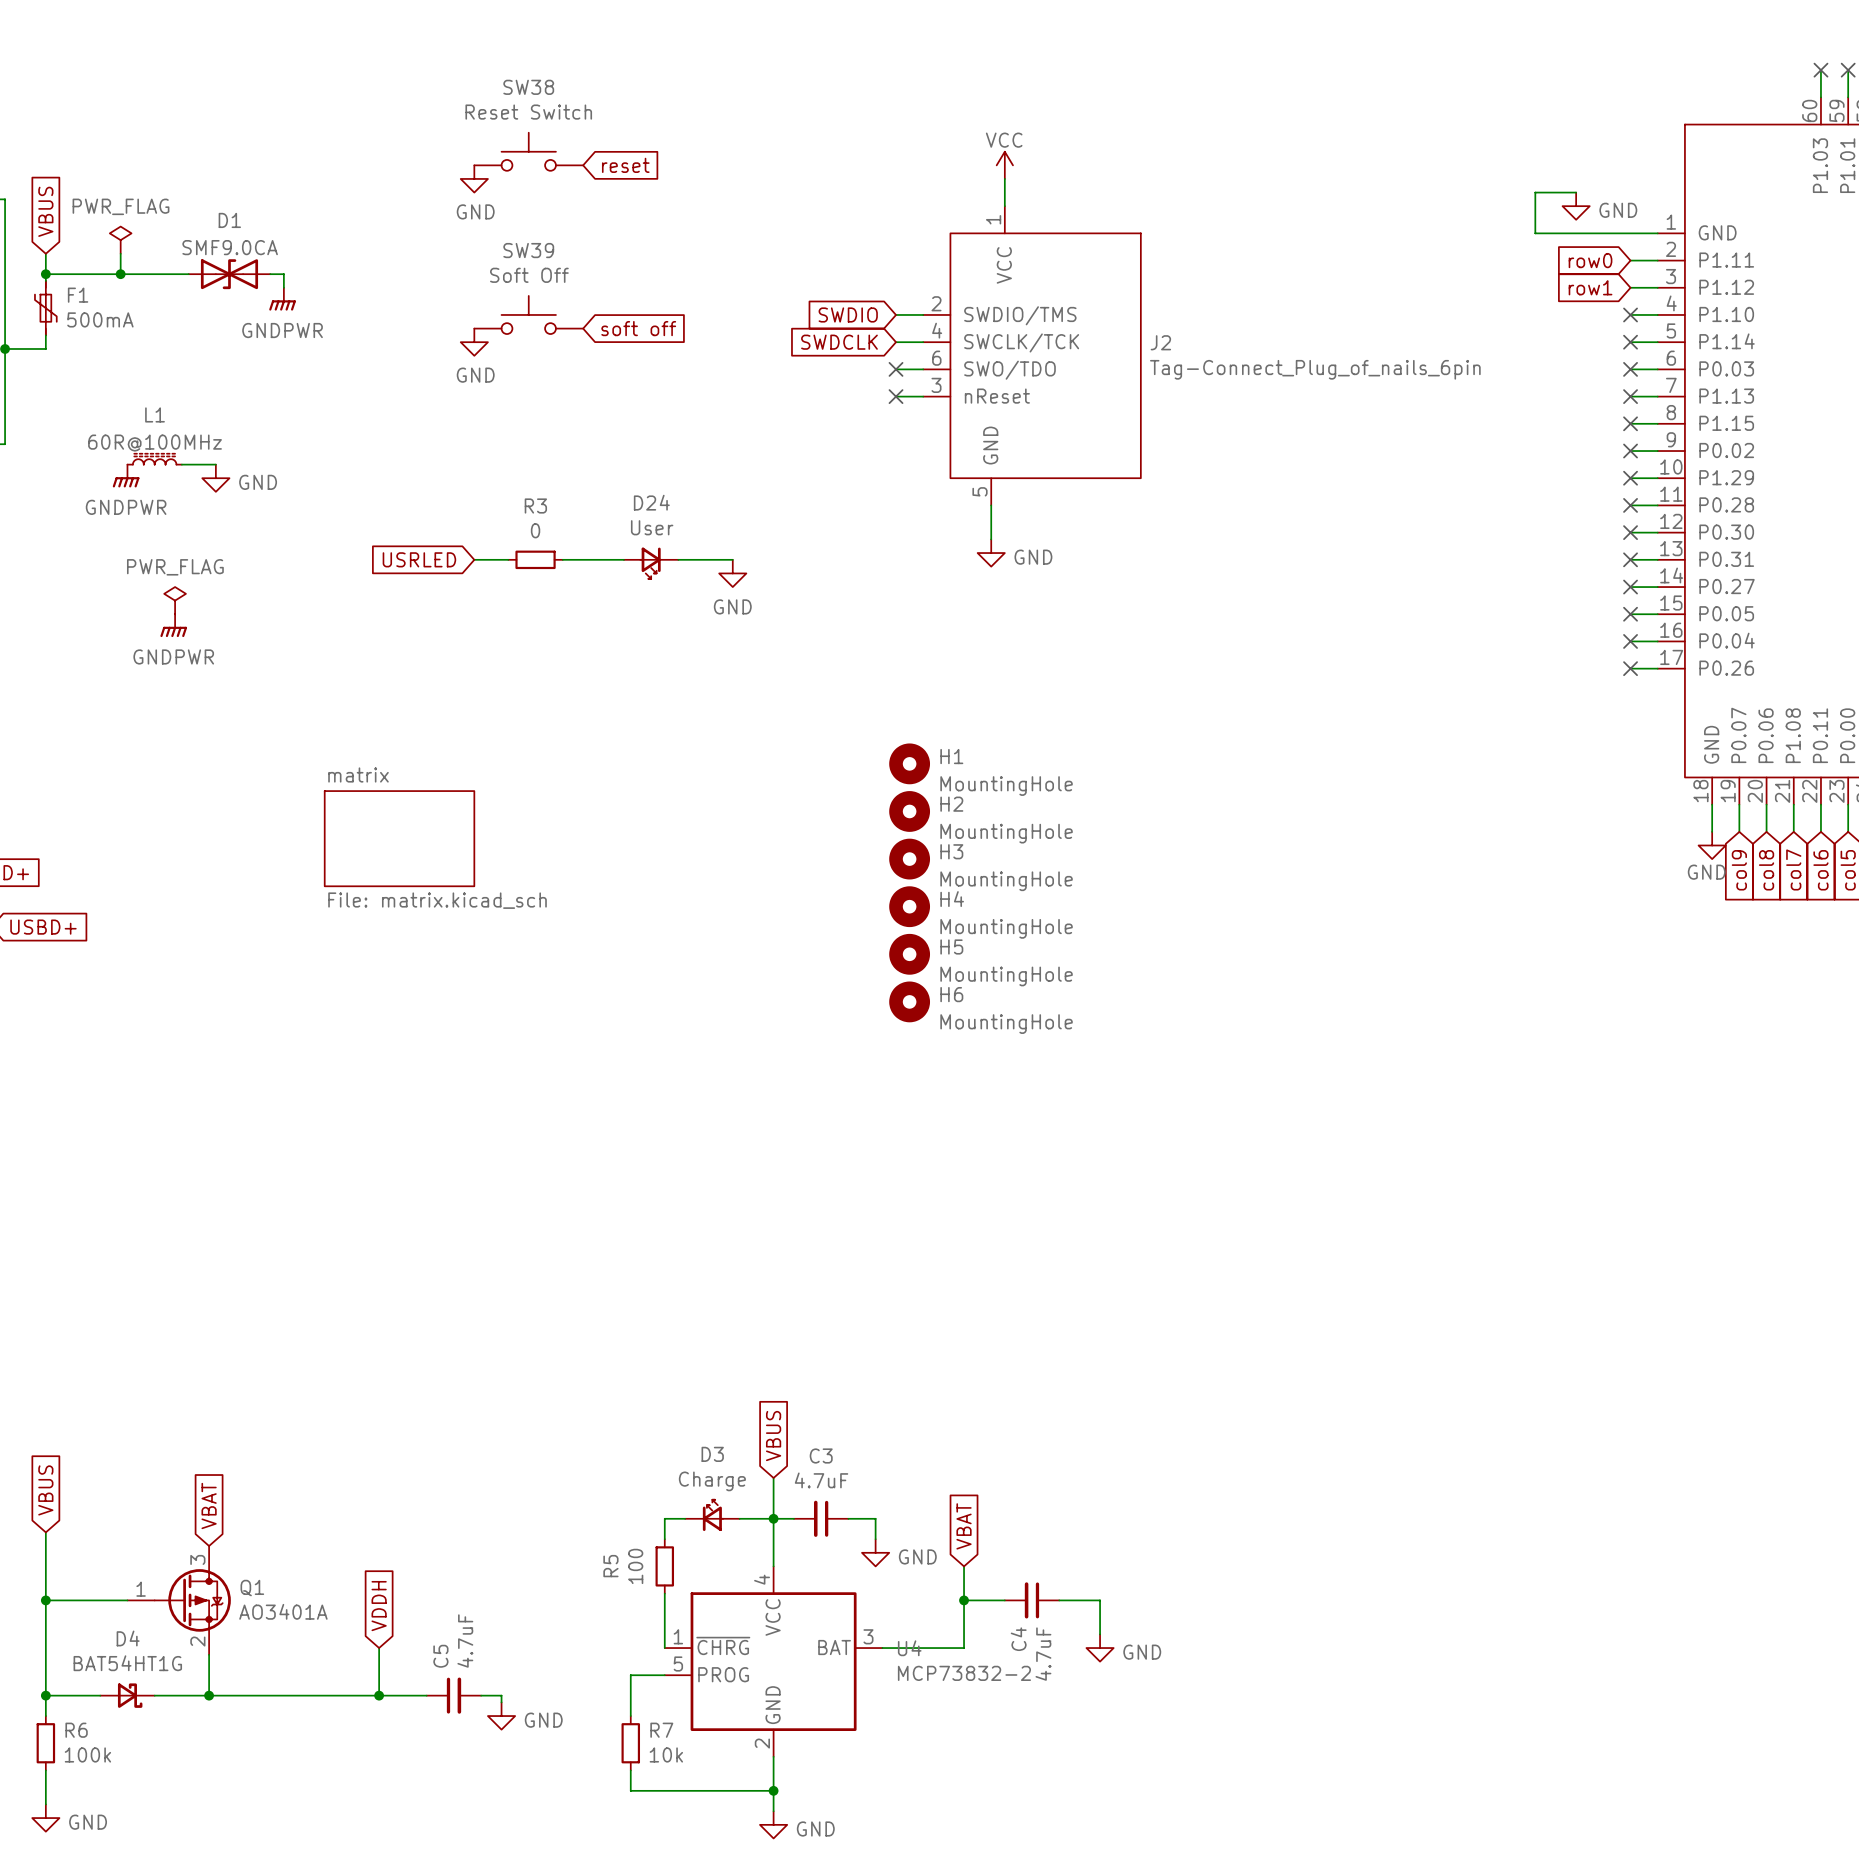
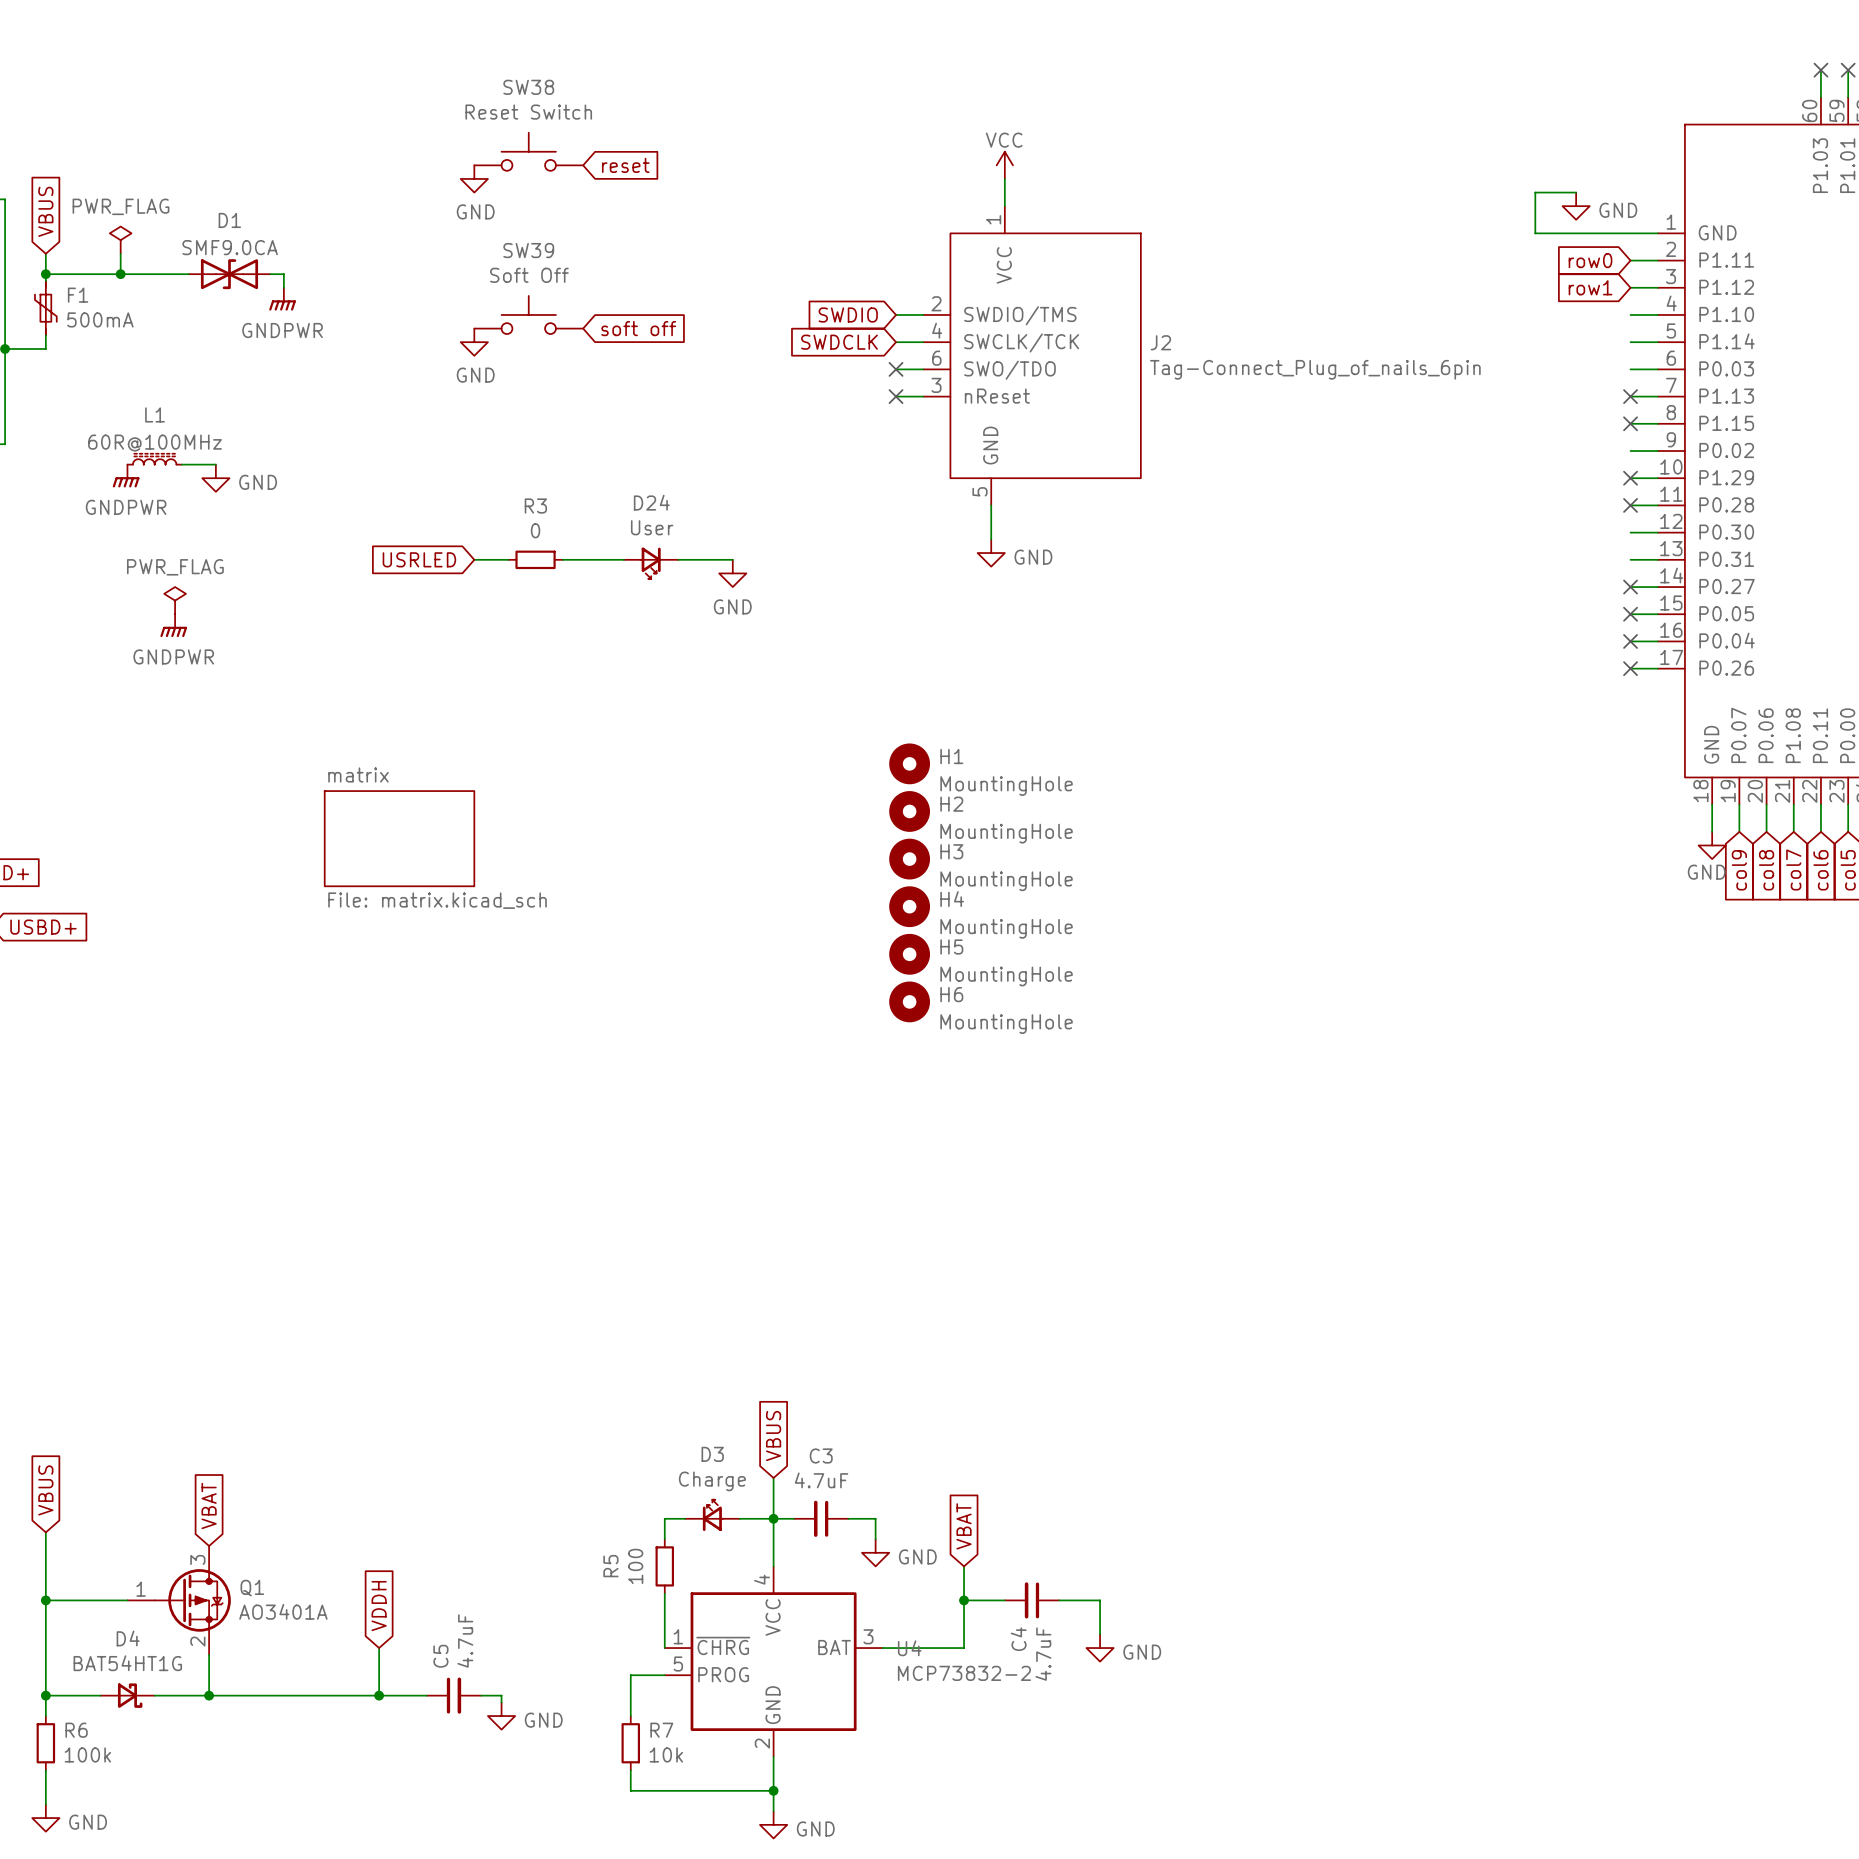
no-connect mark: (1630, 314) -> none
no-connect mark: (1630, 342) -> none
no-connect mark: (1630, 369) -> none
no-connect mark: (1630, 451) -> none
no-connect mark: (1630, 532) -> none
no-connect mark: (1630, 559) -> none

